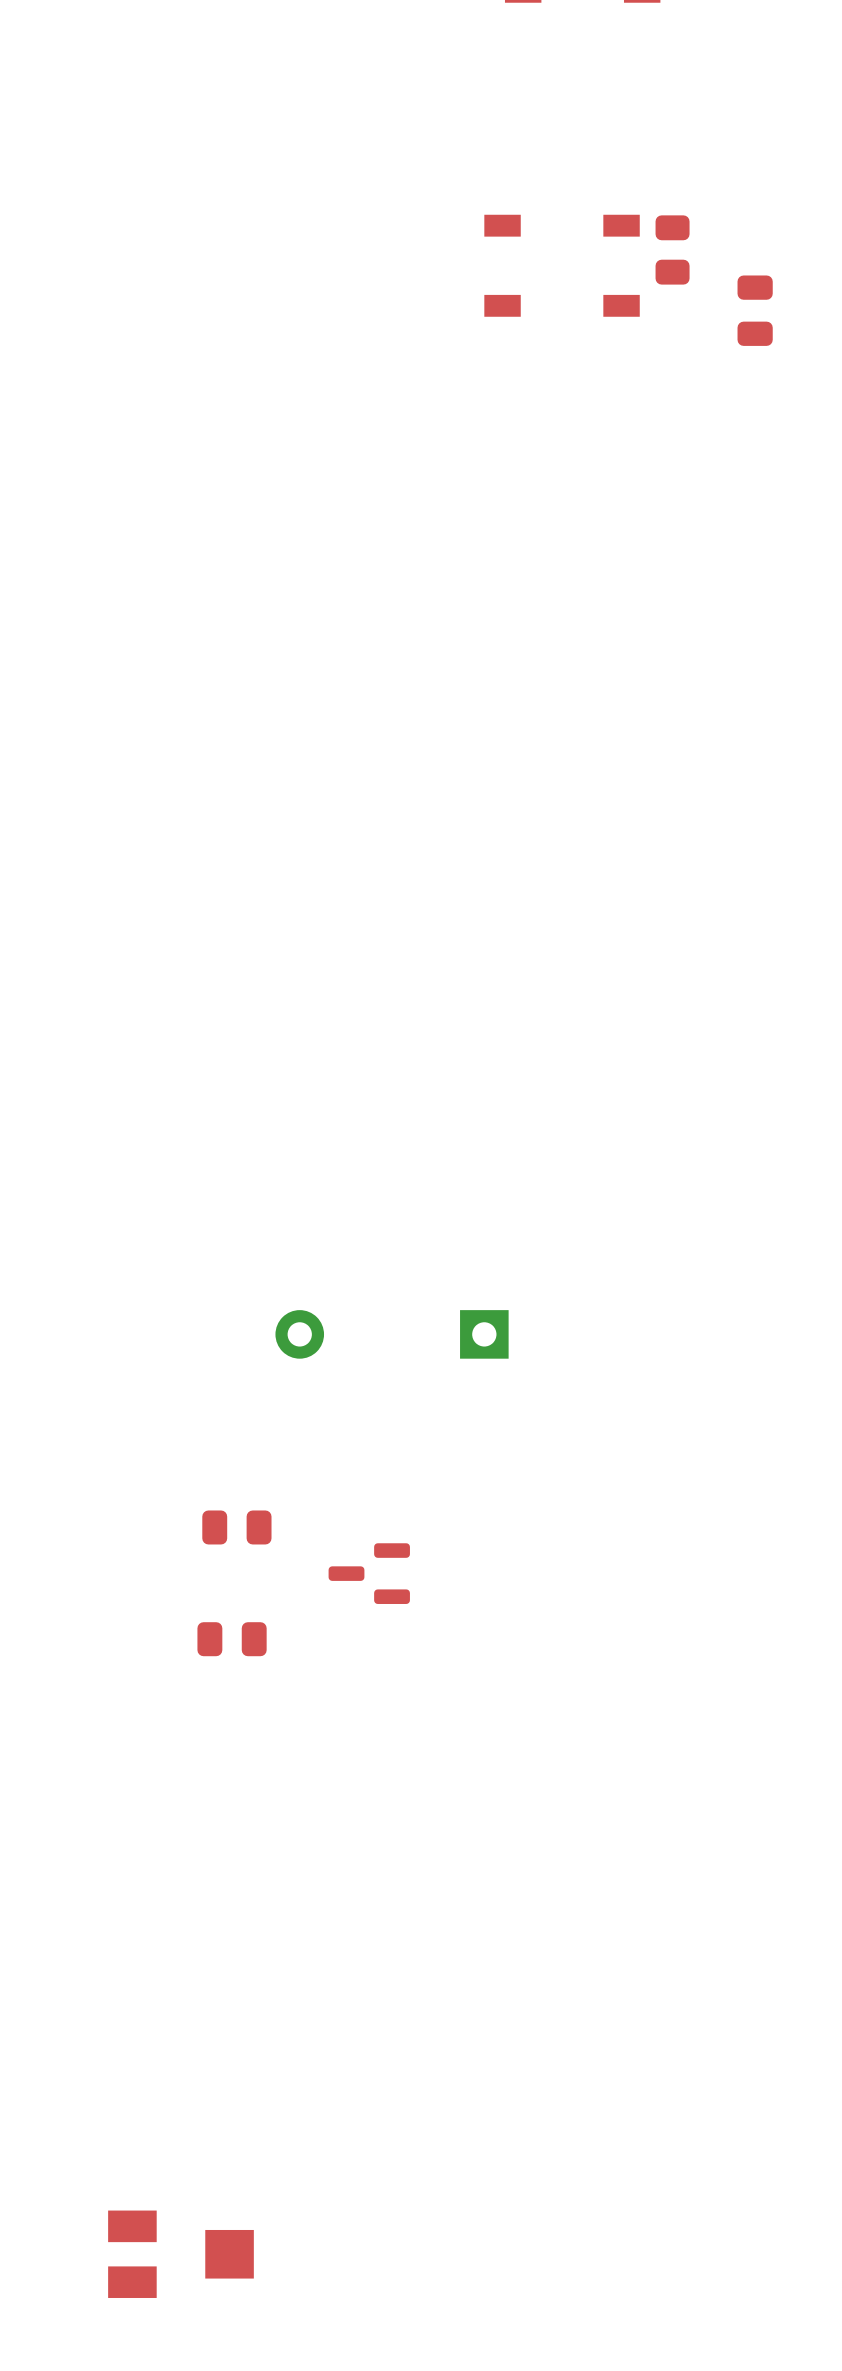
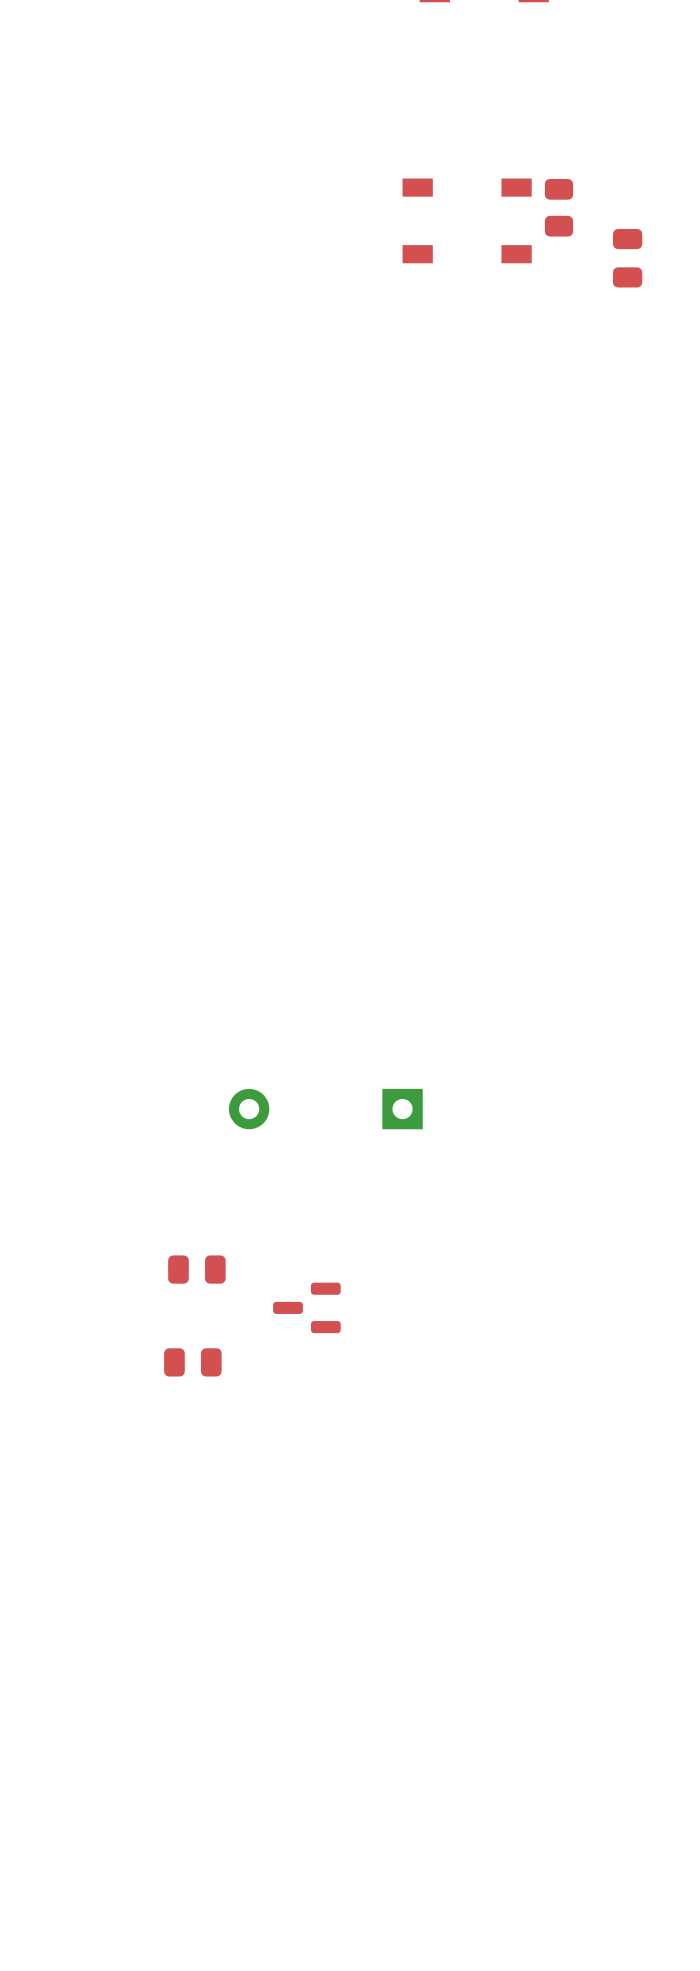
part: (180, 2254) -> none

